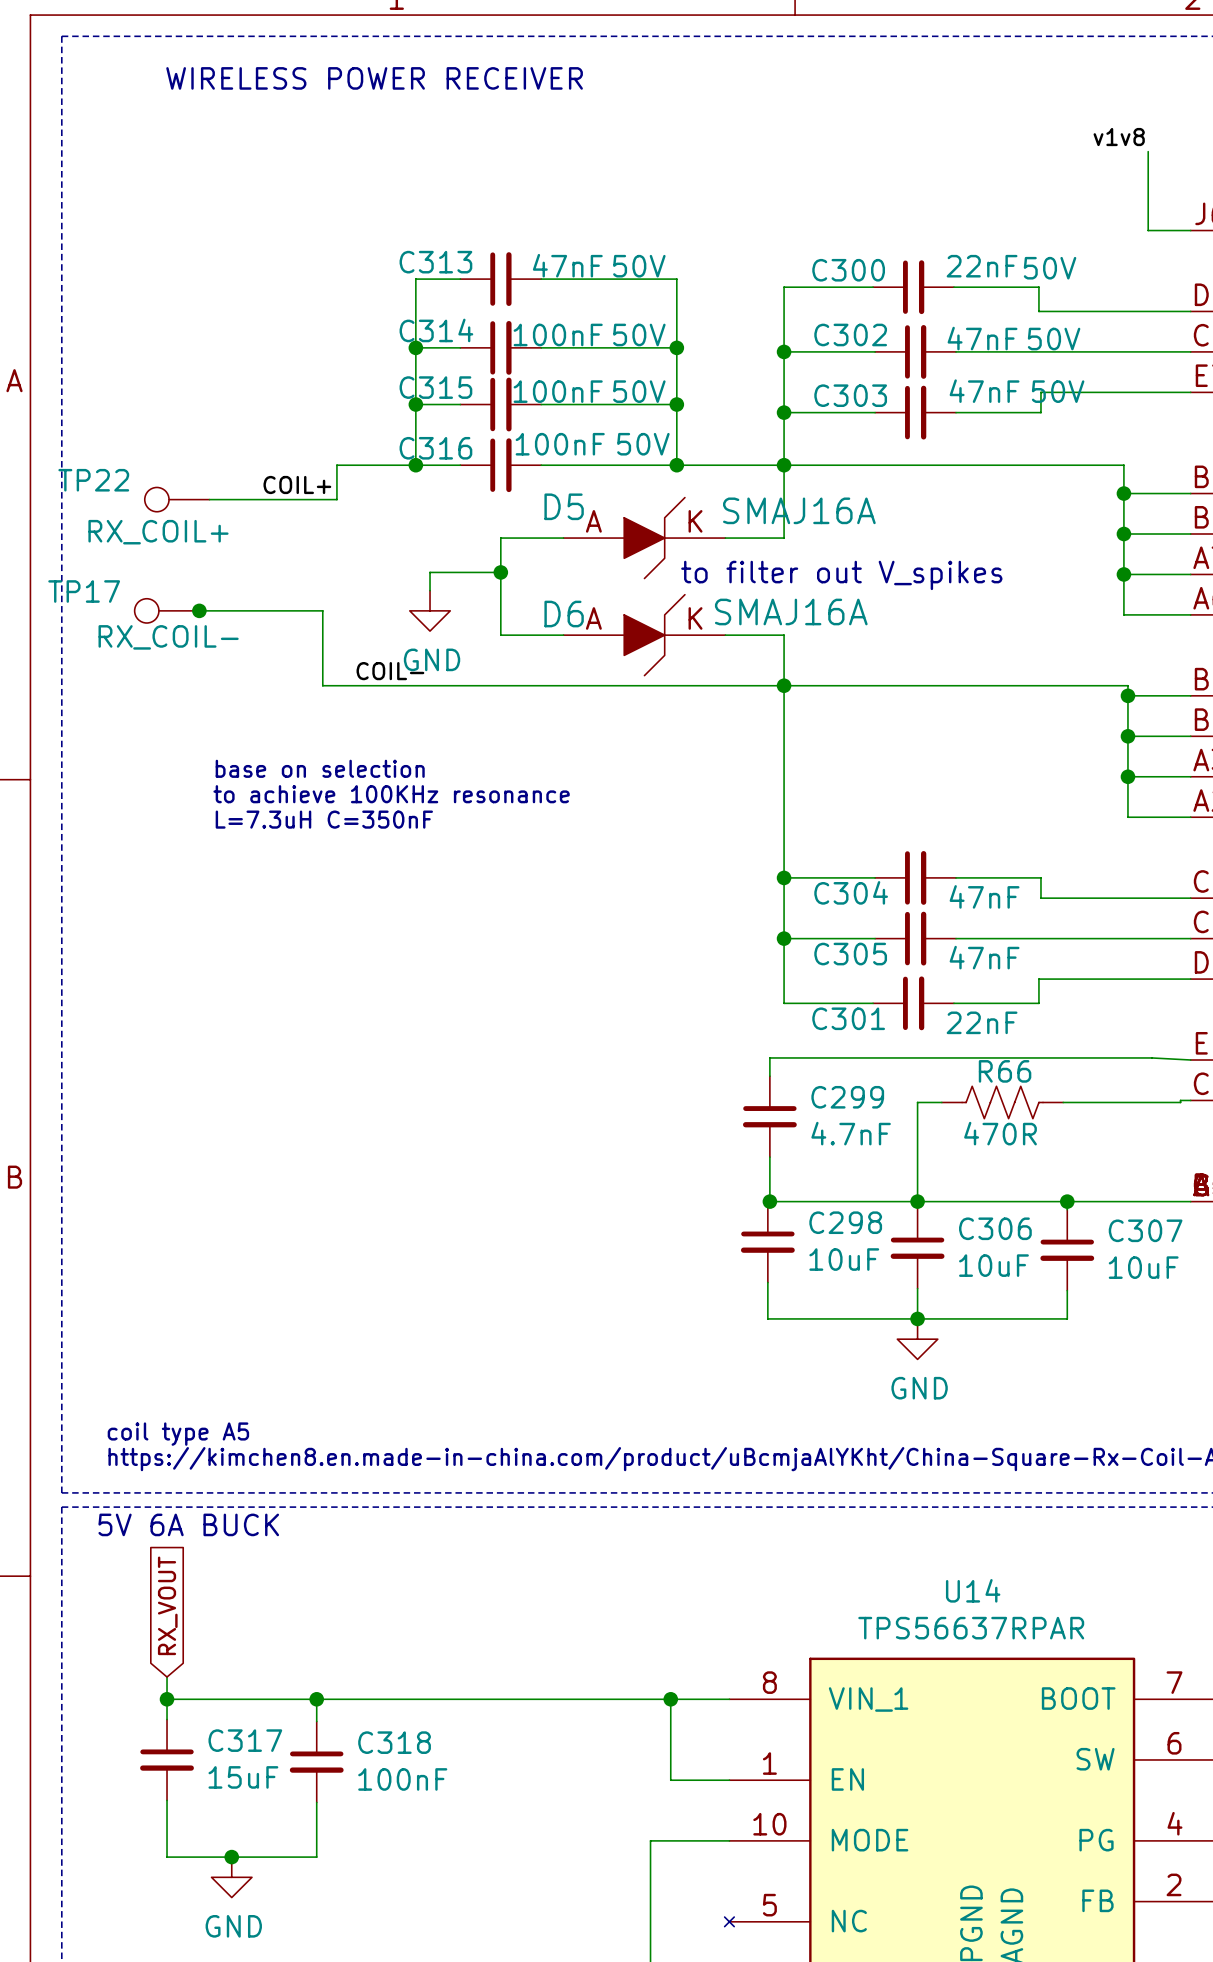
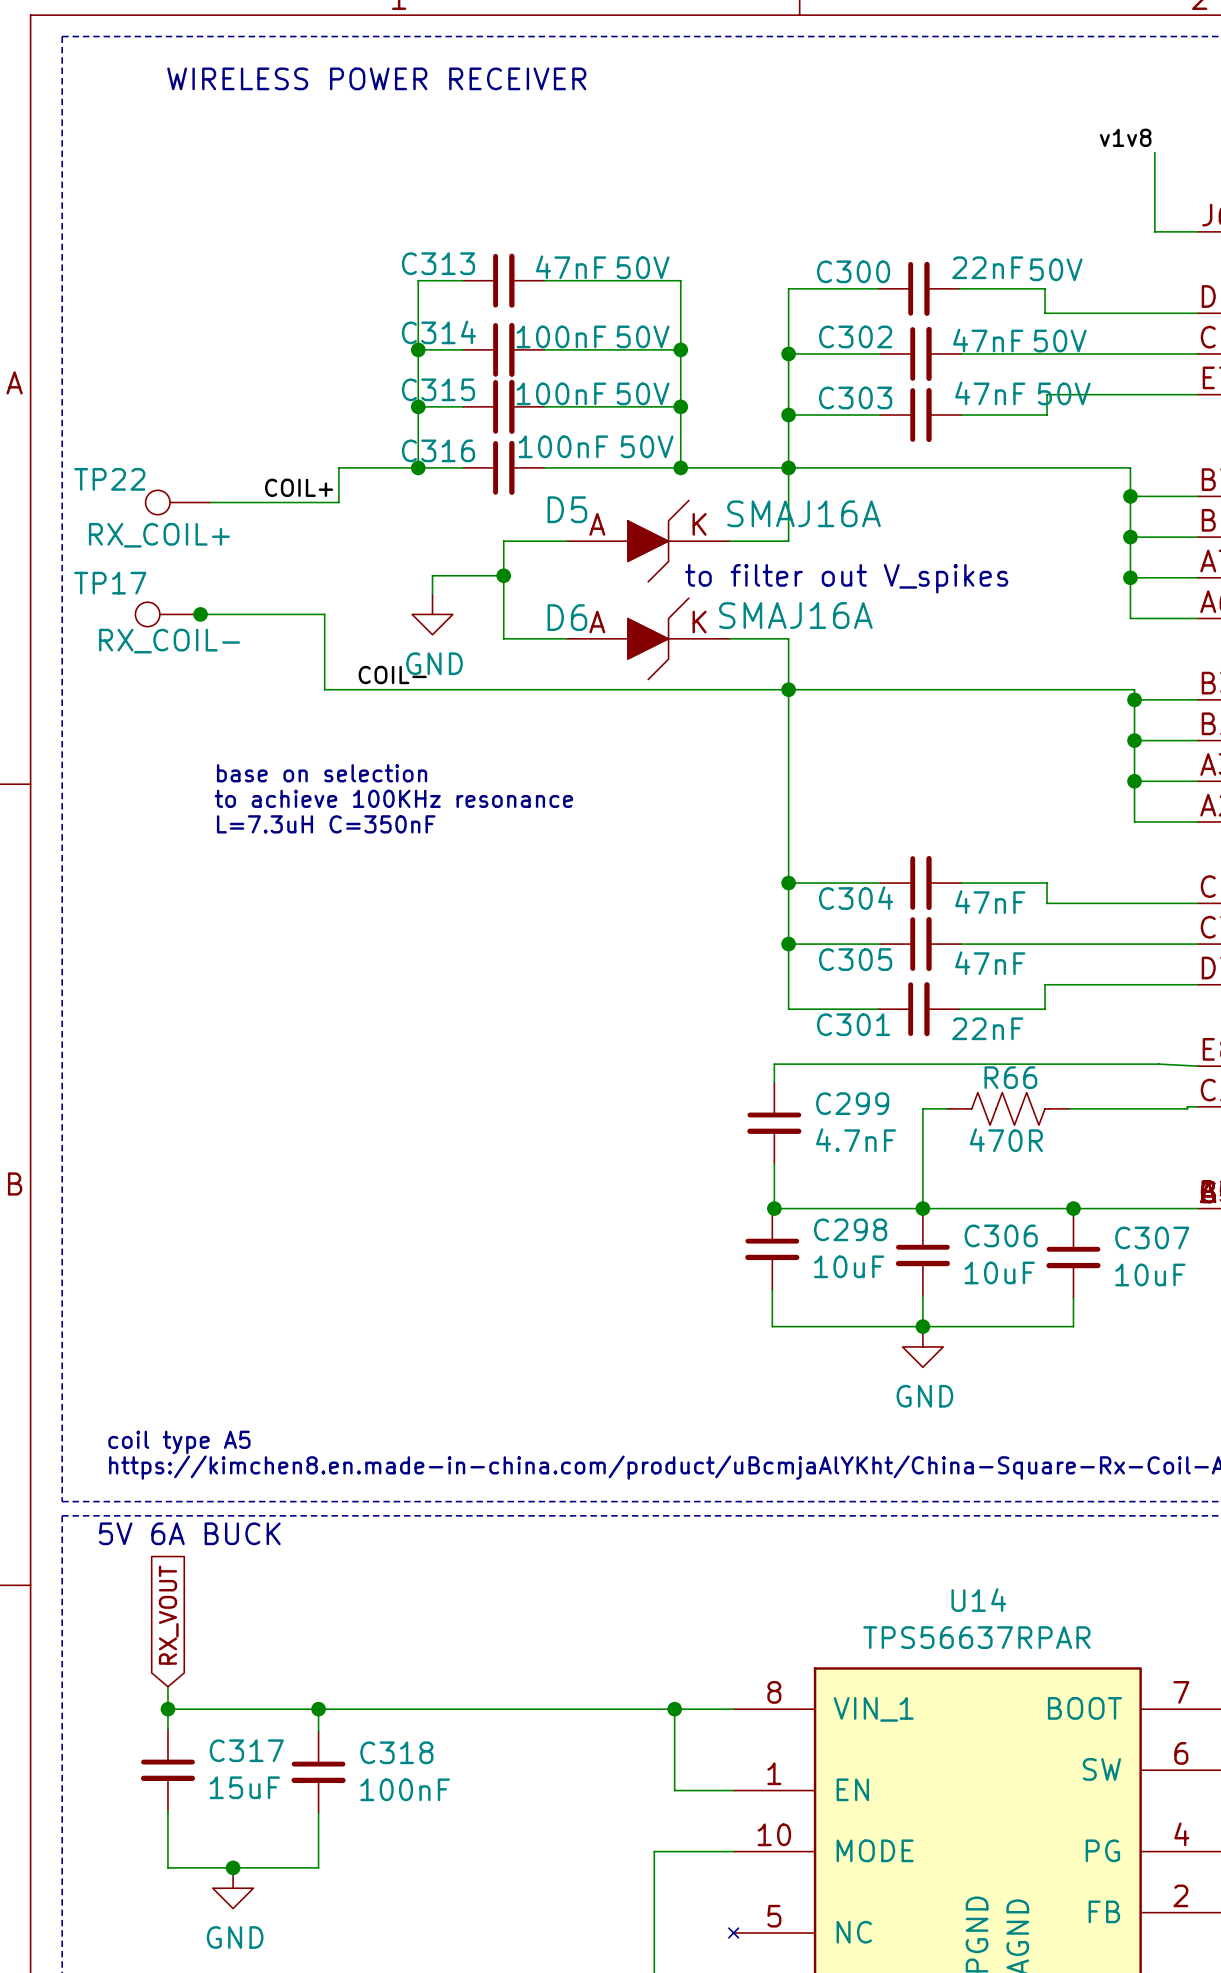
TP22 name position: TP22 (93, 480) -> TP22 (109, 479)
TP17 name position: TP17 (84, 591) -> TP17 (110, 583)

